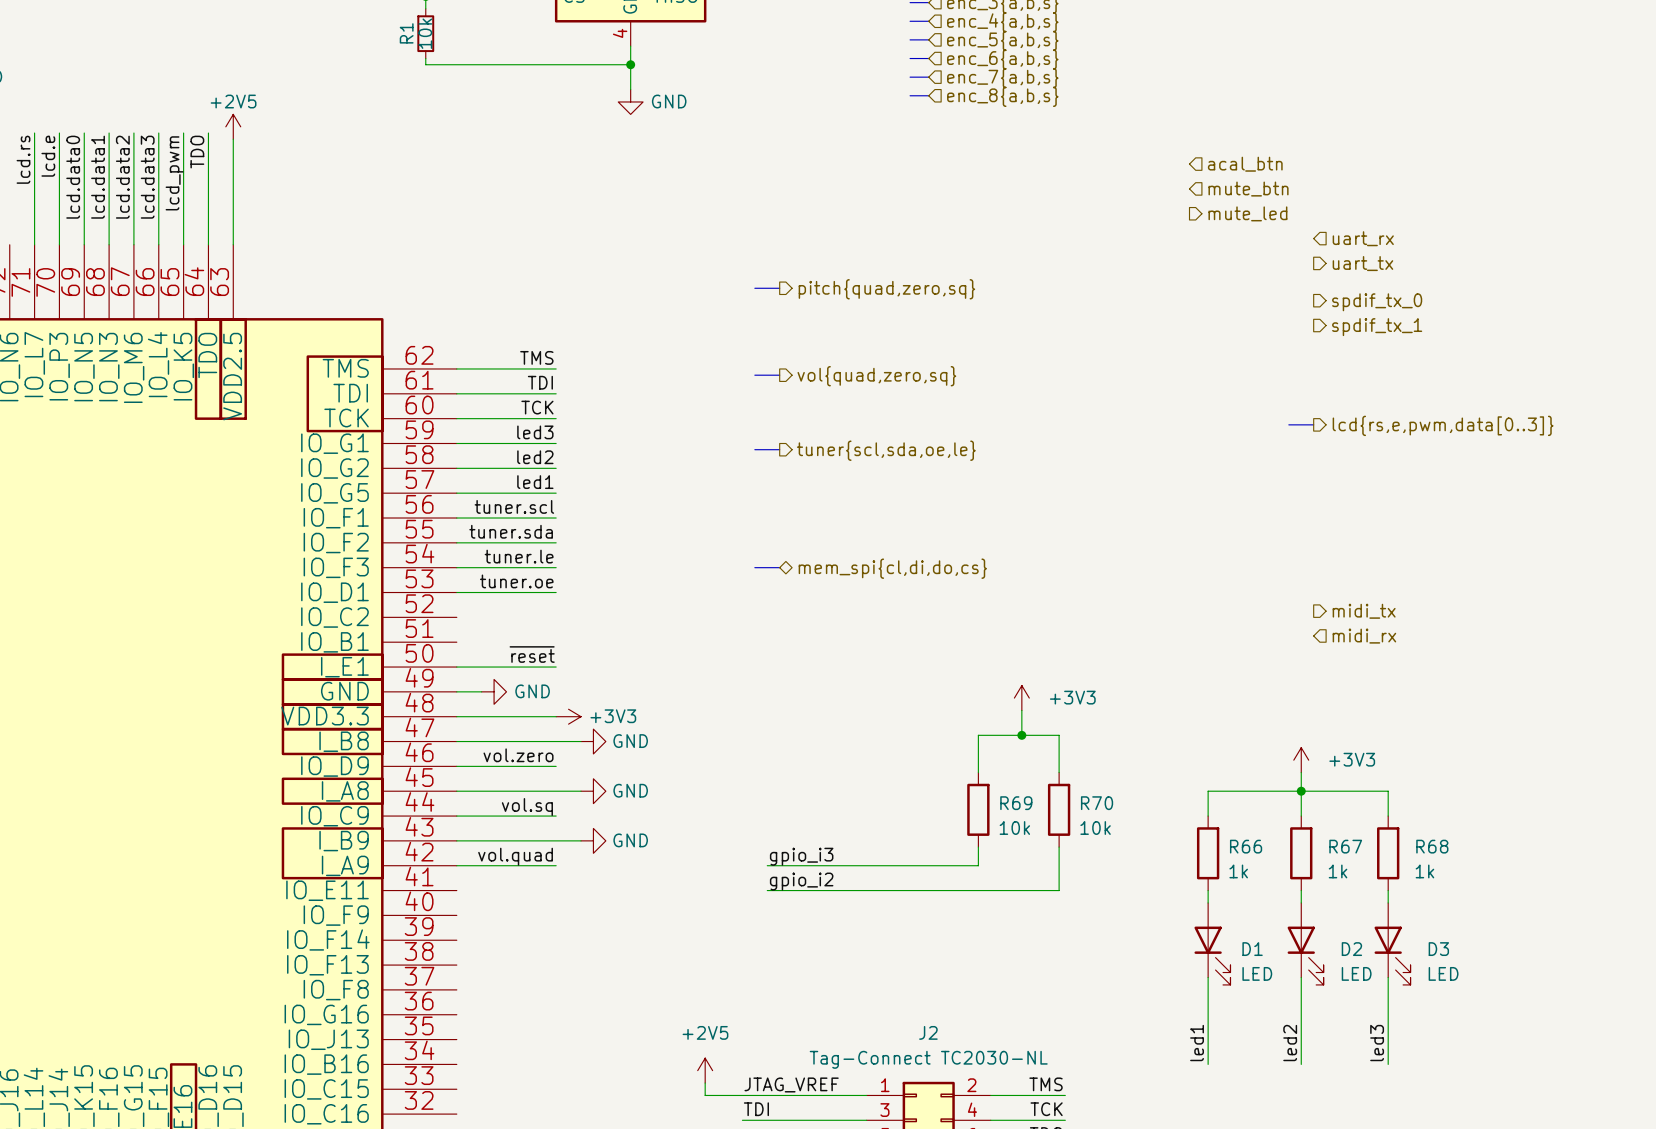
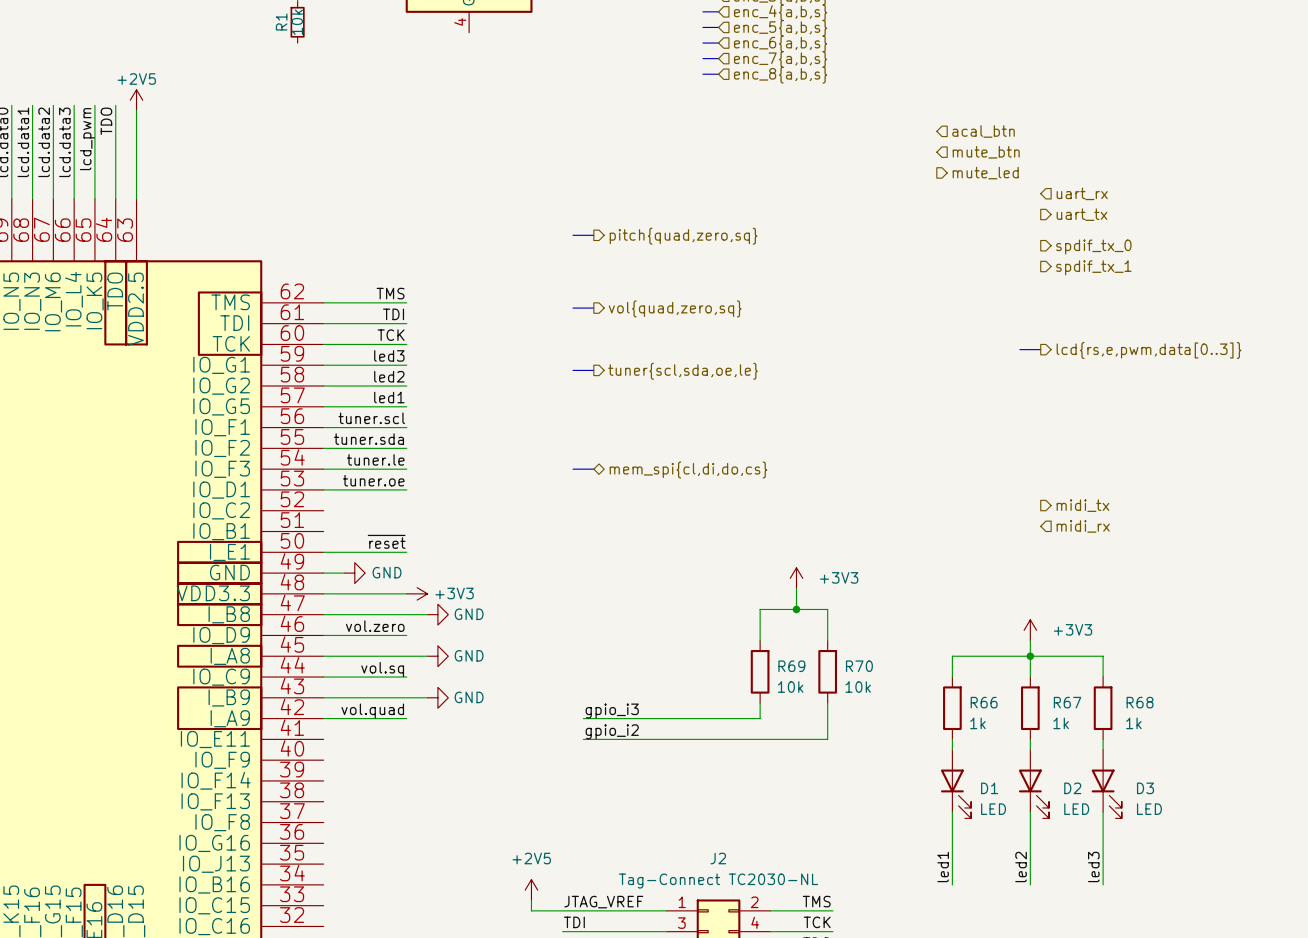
wire: (630, 46) (630, 89) -> none
wire: (425, 58) (425, 64) (630, 64) -> none
junction: (630, 64) -> none
power symbol: GND (630, 101) -> none

